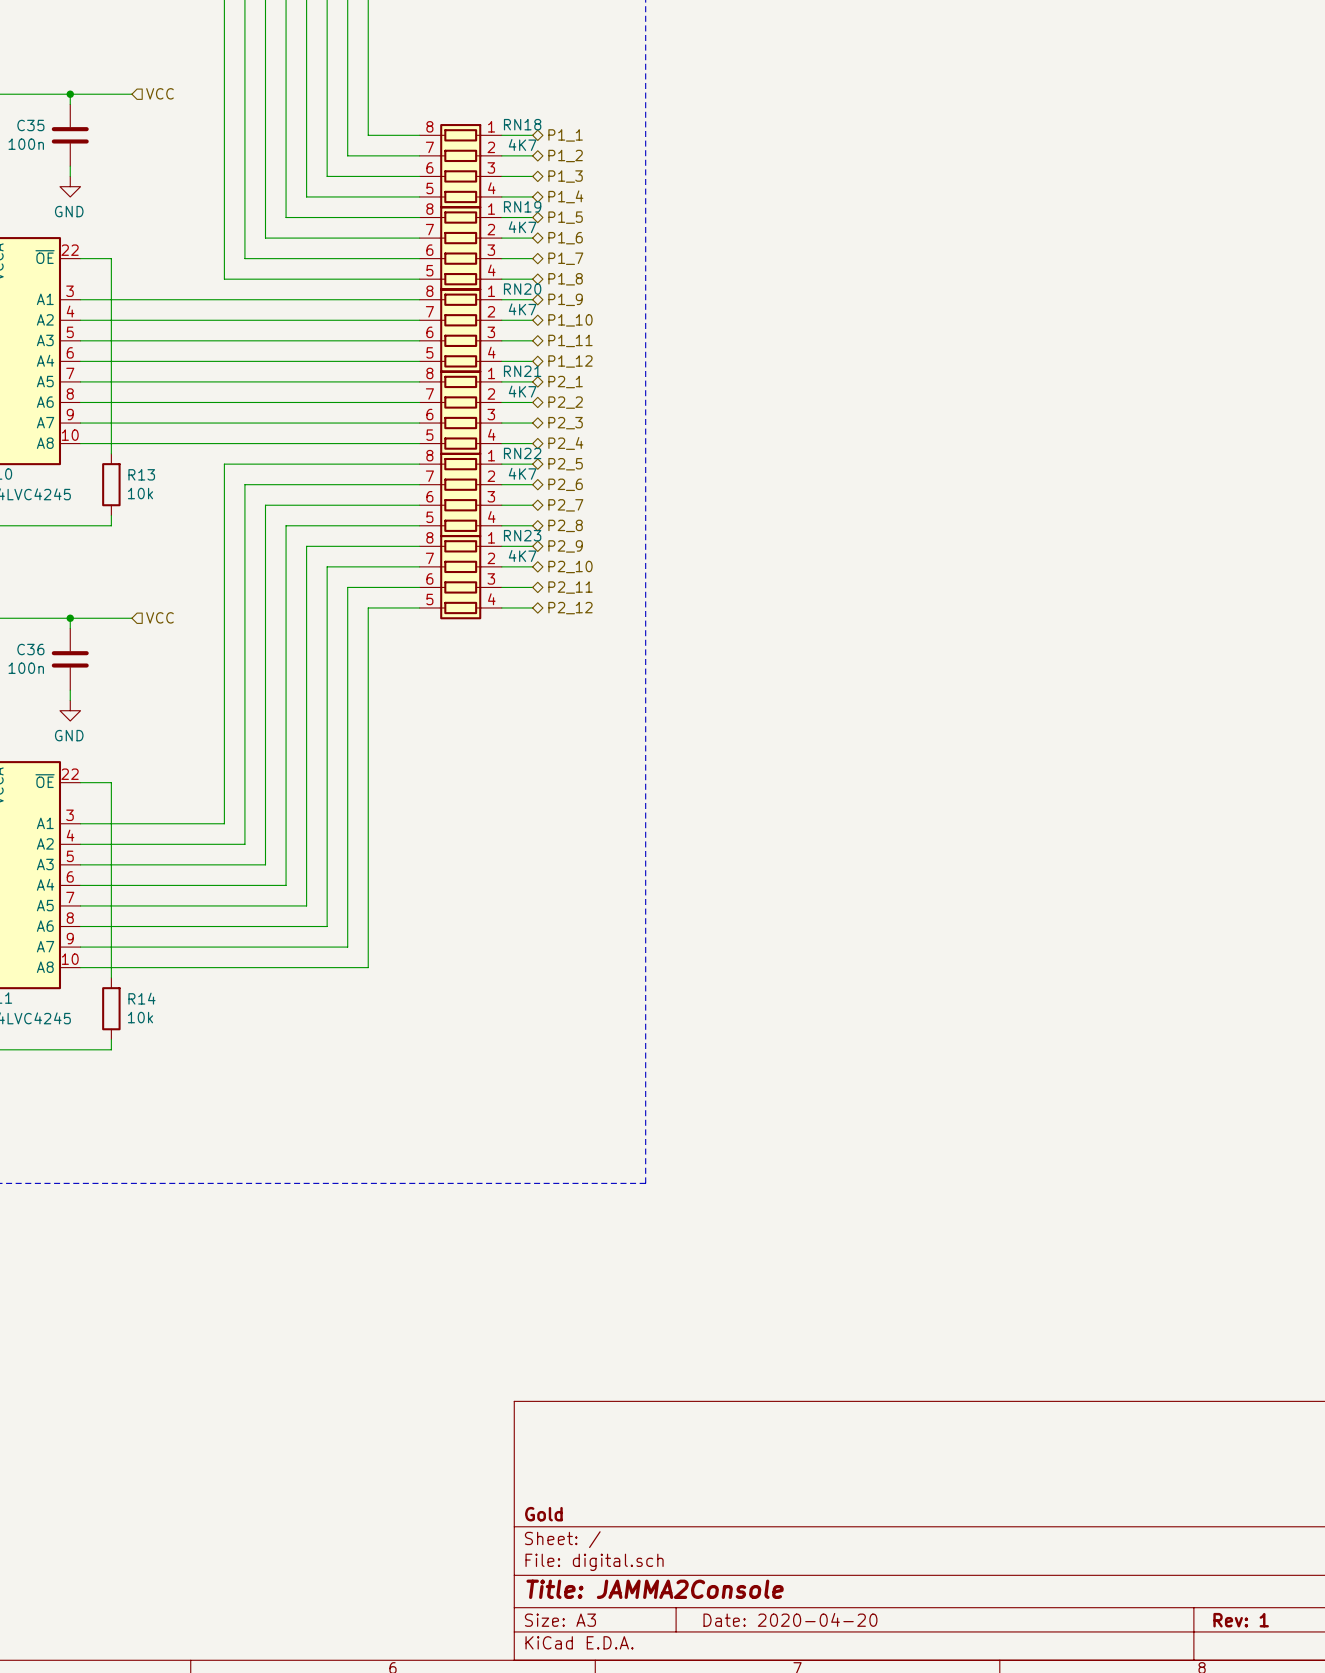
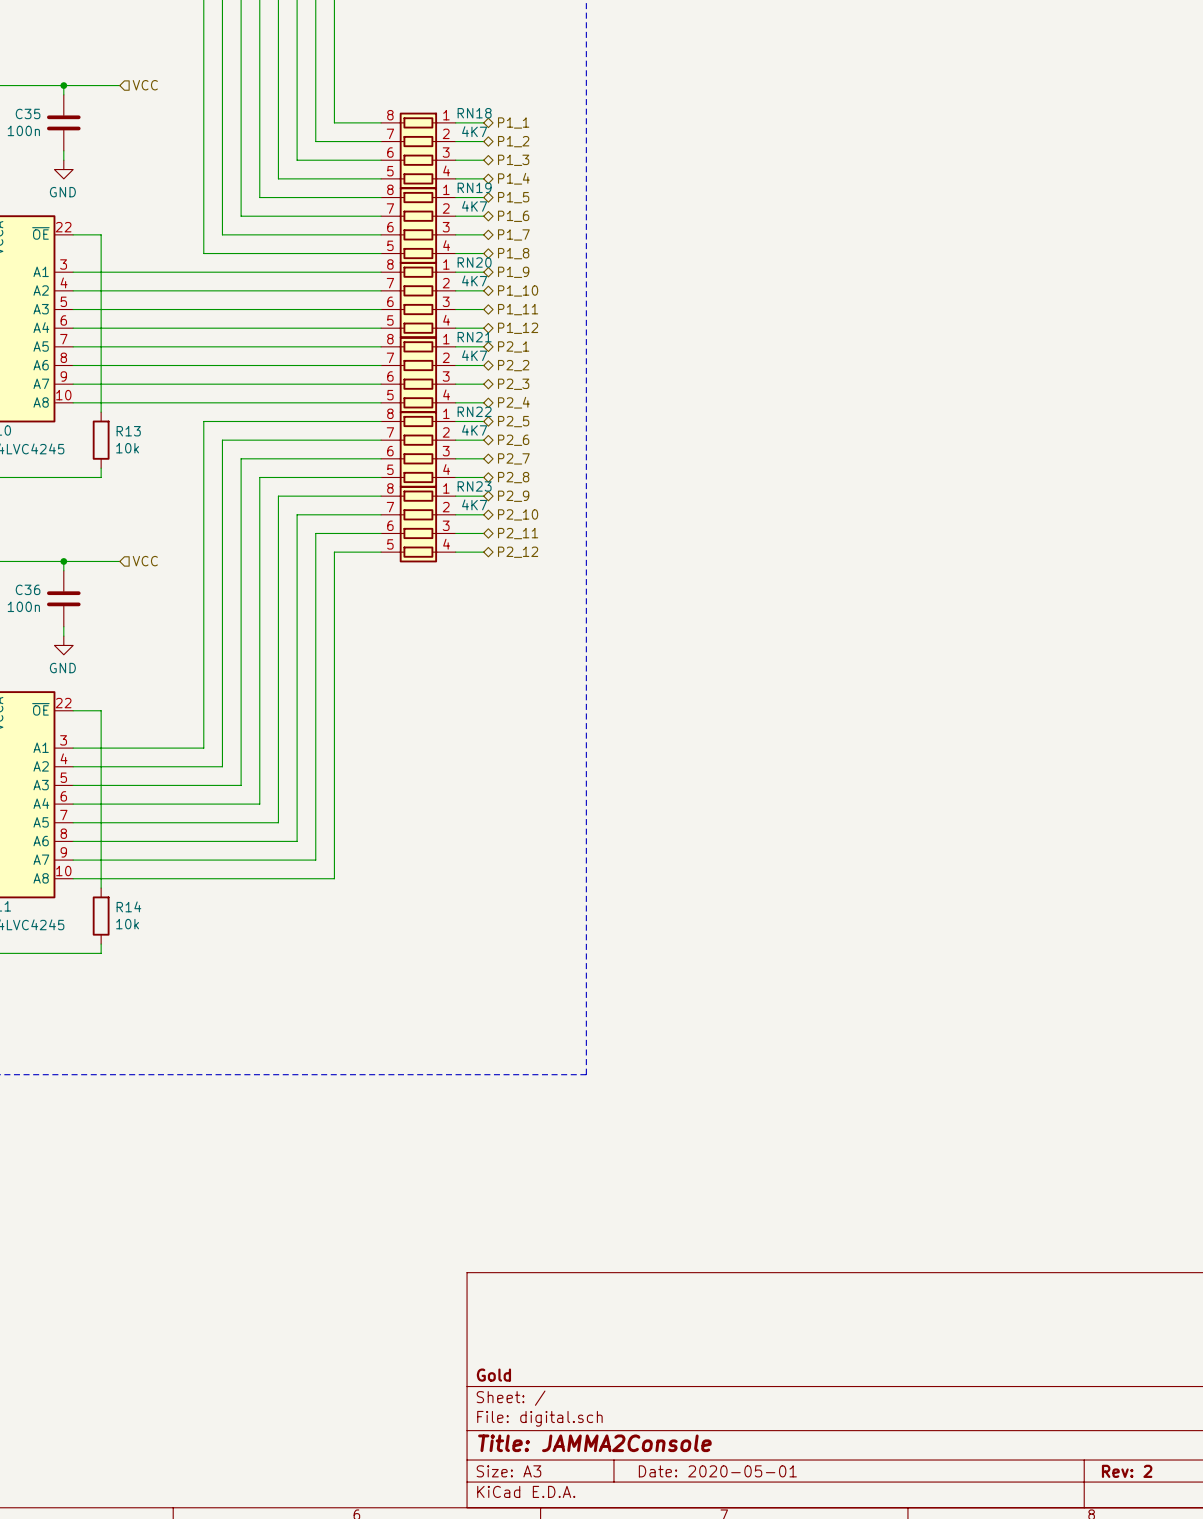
title block: Date: 2020-04-20 (790, 1619) -> Date: 2020-05-01 (717, 1471)
title block: Rev: 1 (1241, 1620) -> Rev: 2 (1127, 1471)

